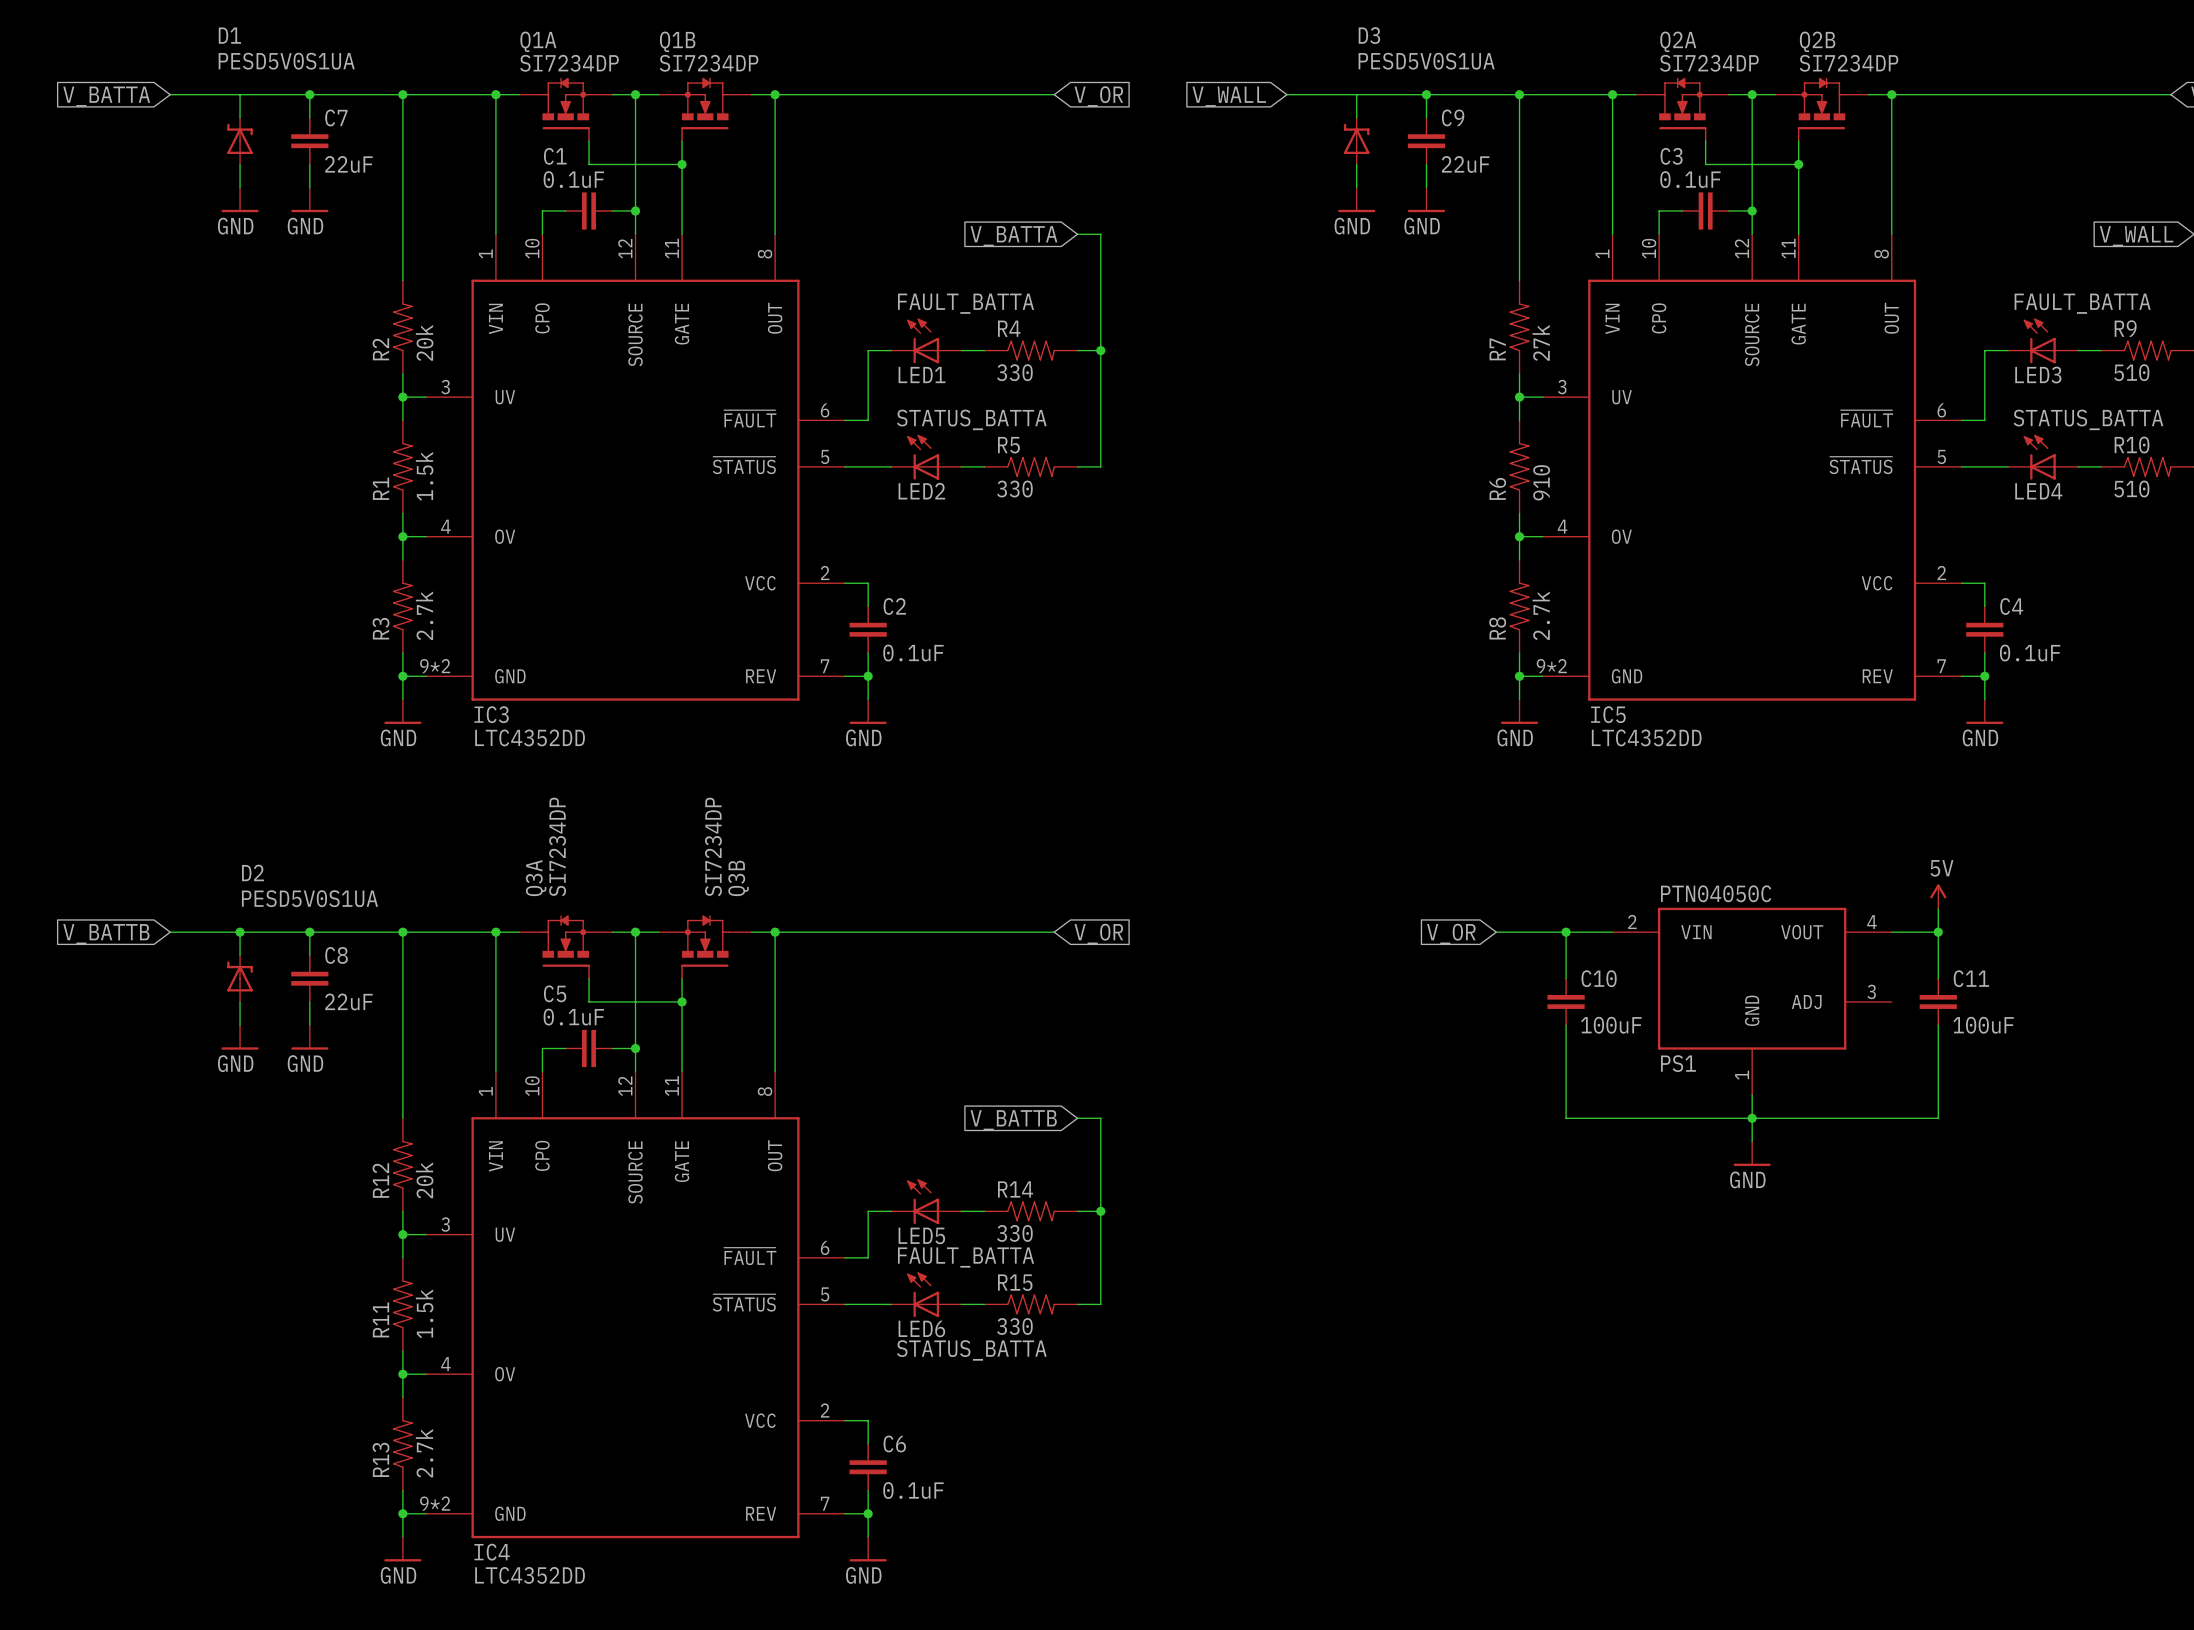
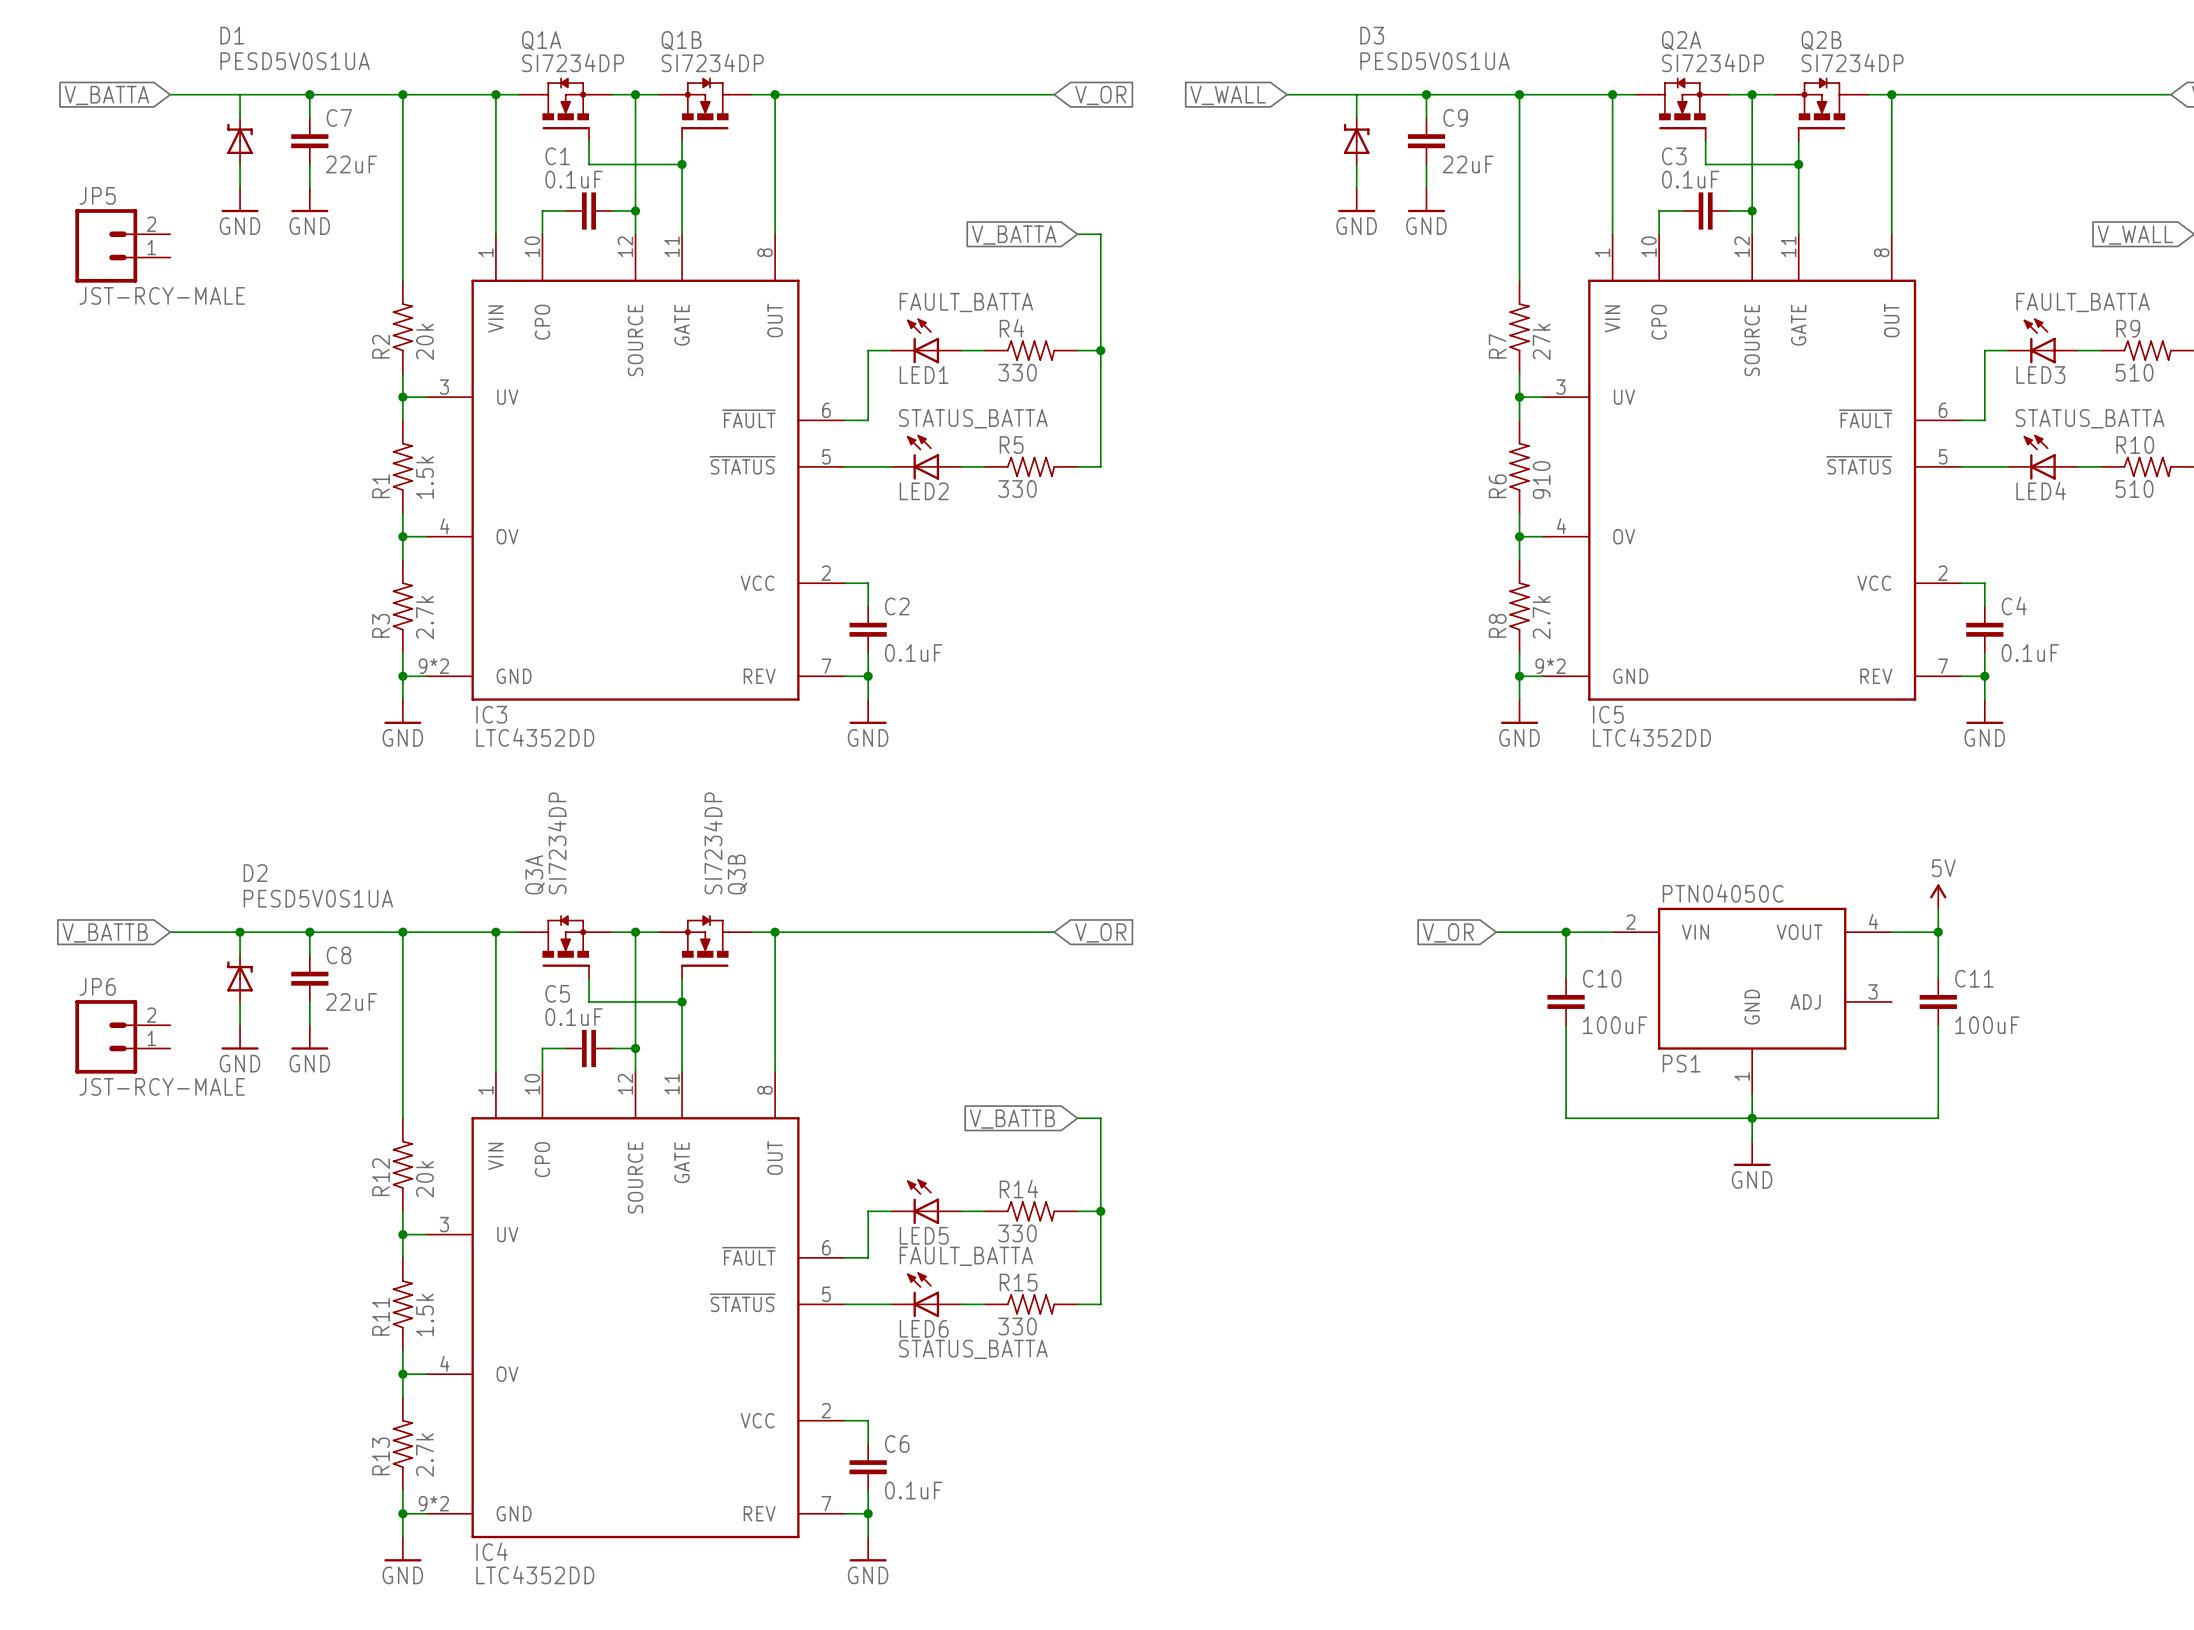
JP5: none -> JST-RCY-MALE (122, 245)
JP6: none -> JST-RCY-MALE (122, 1036)

